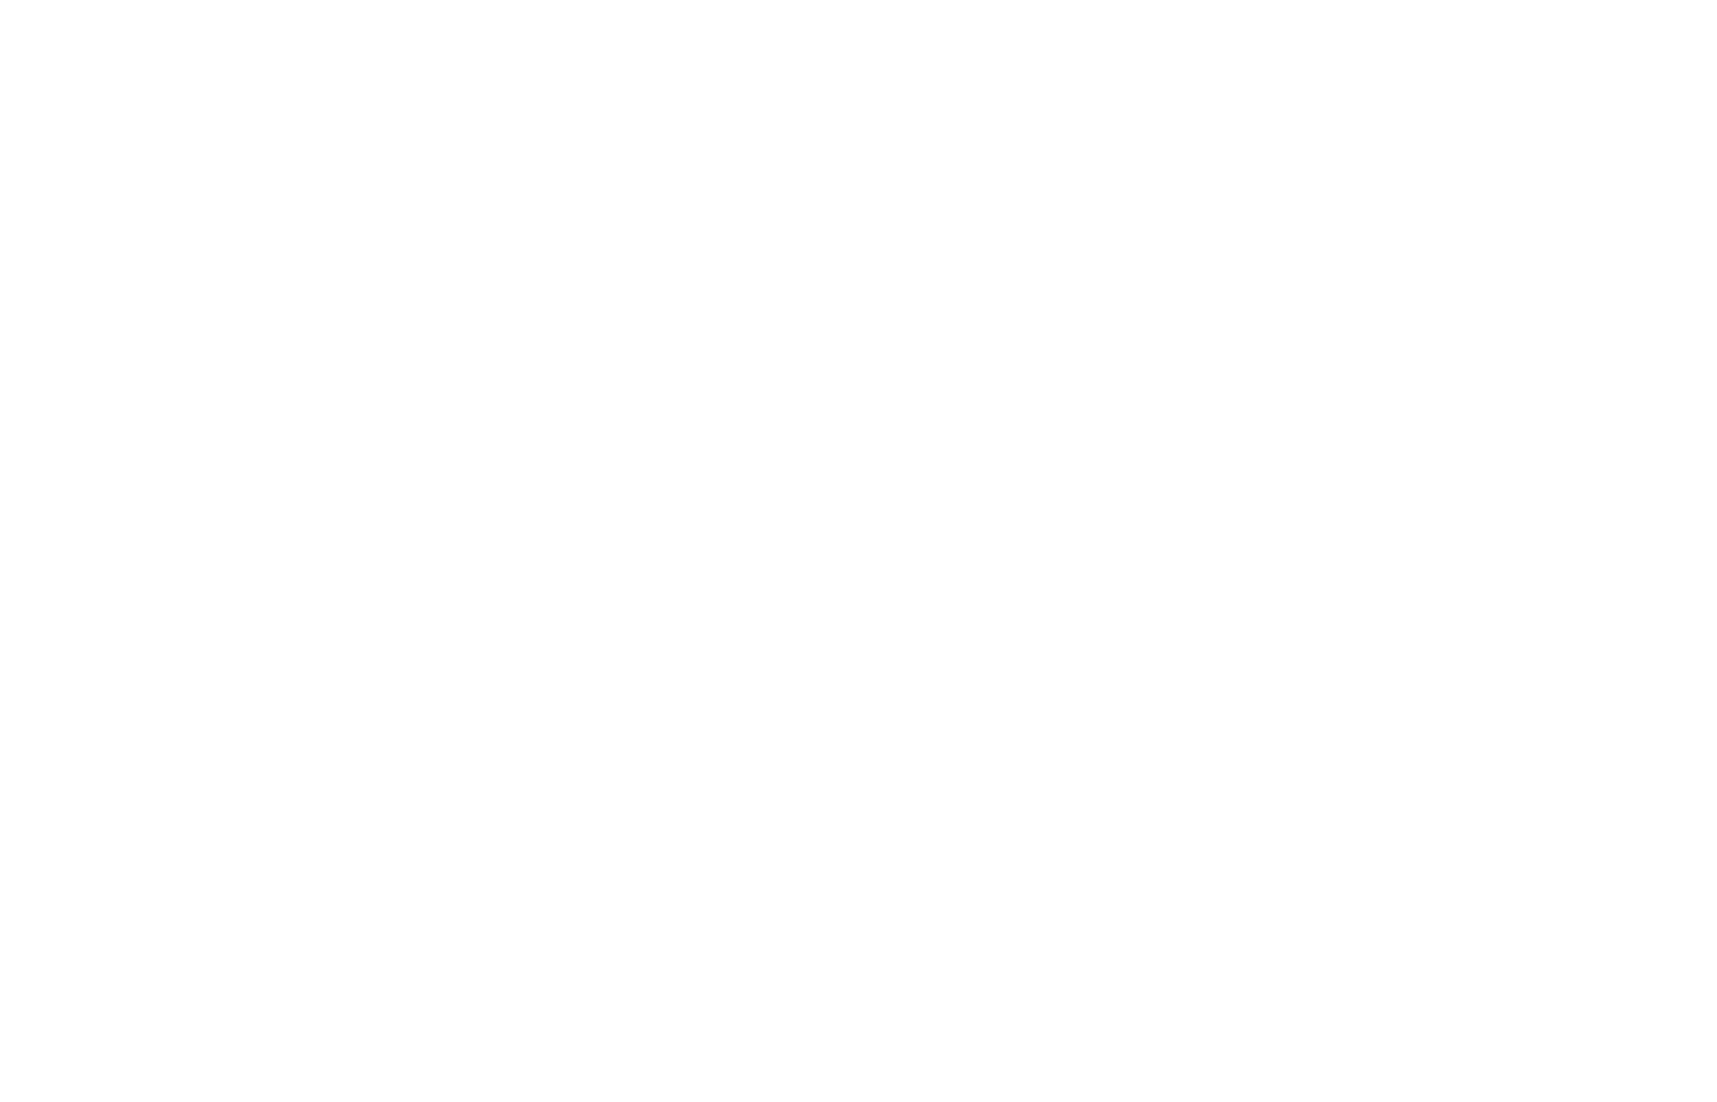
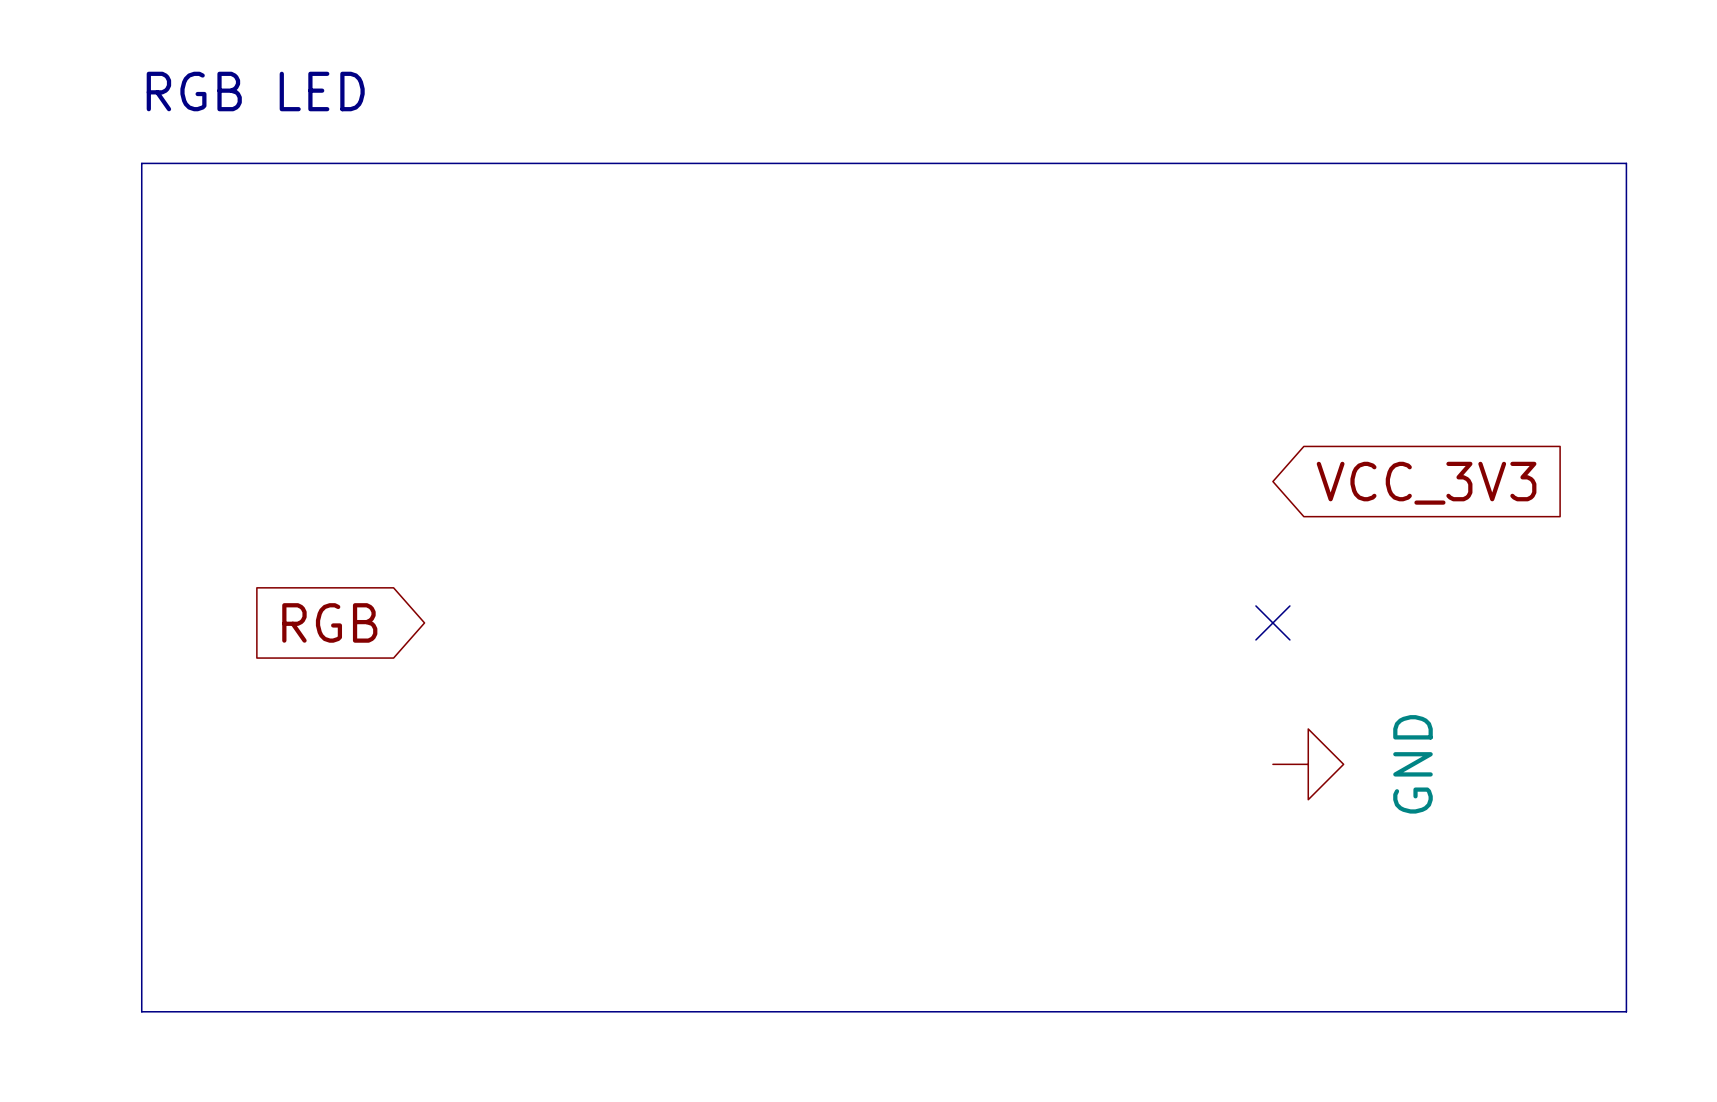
text: none -> RGB LED (255, 91)
line: none -> (141, 163) (1626, 163) (1626, 1011) (141, 1011) (141, 163)
global label: none -> VCC_3V3 (1426, 483)
global label: none -> RGB (329, 622)
no-connect mark: none -> (1272, 622)
power symbol: none -> GND (1308, 764)

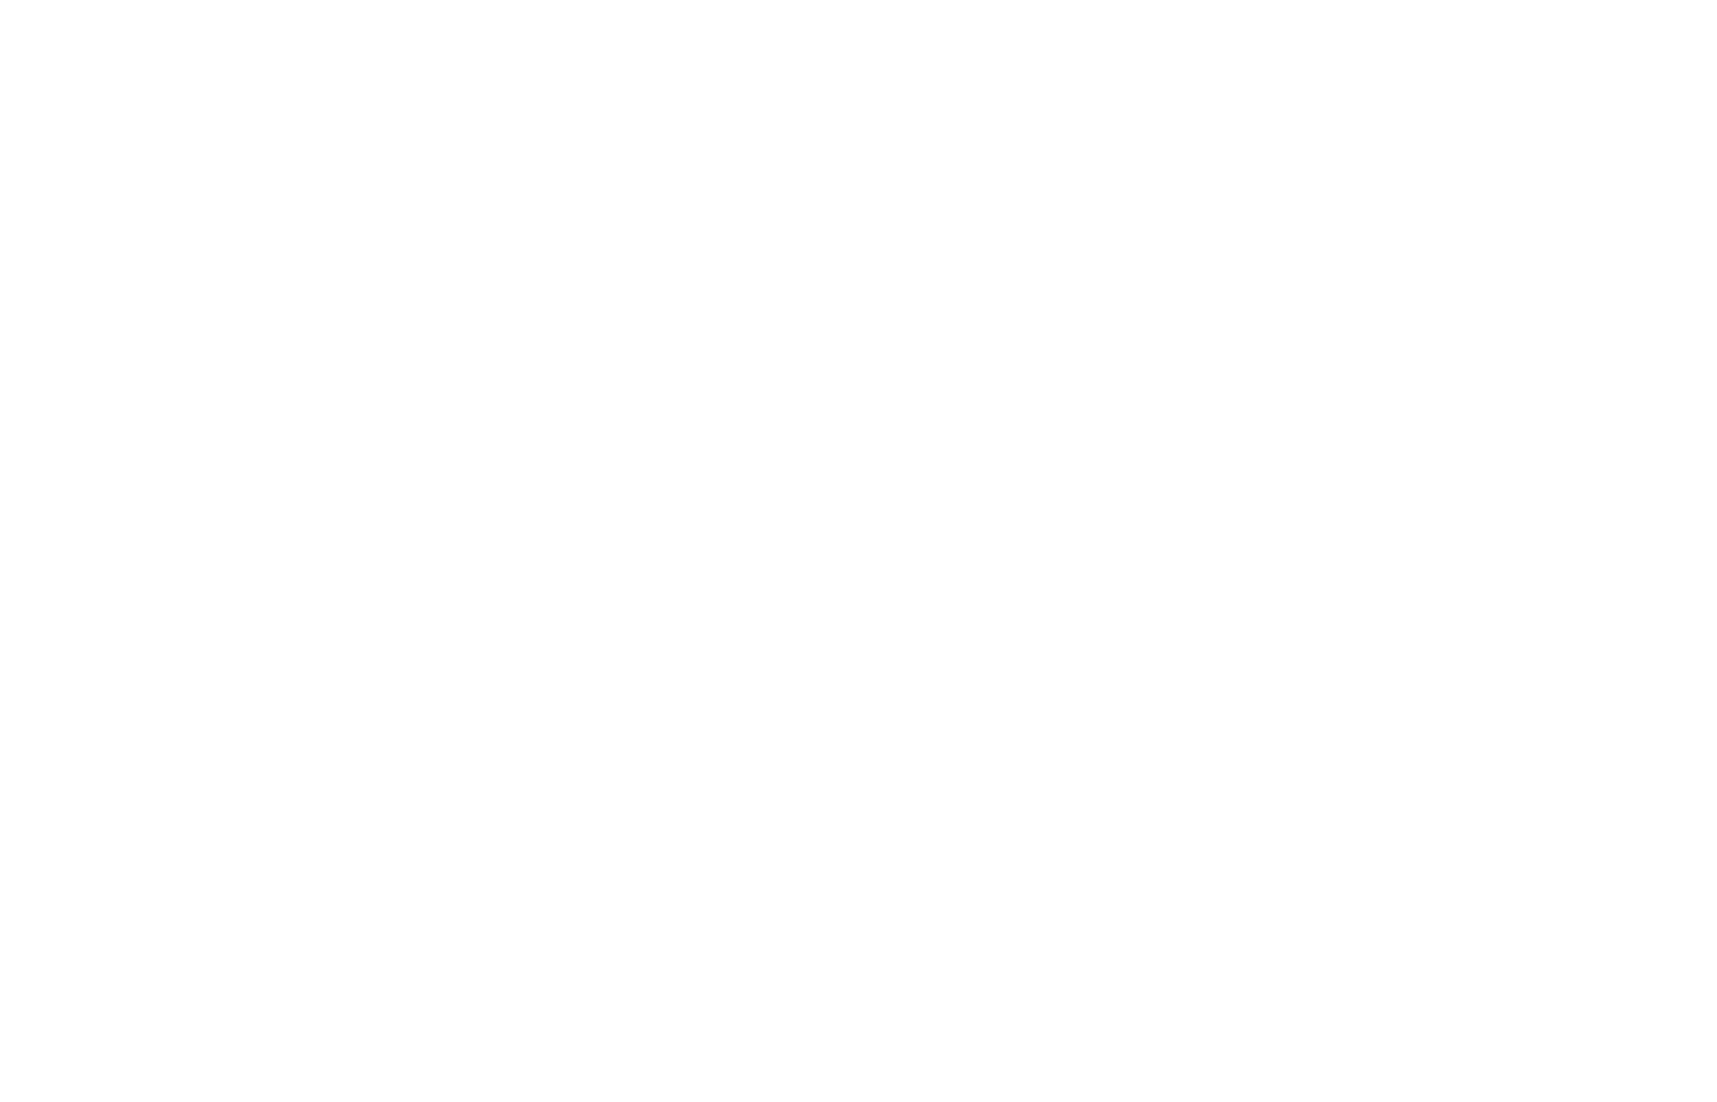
text: RGB LED (255, 91) -> none
line: (141, 163) (1626, 163) (1626, 1011) (141, 1011) (141, 163) -> none
global label: VCC_3V3 (1426, 483) -> none
global label: RGB (329, 622) -> none
no-connect mark: (1272, 622) -> none
power symbol: GND (1308, 764) -> none

